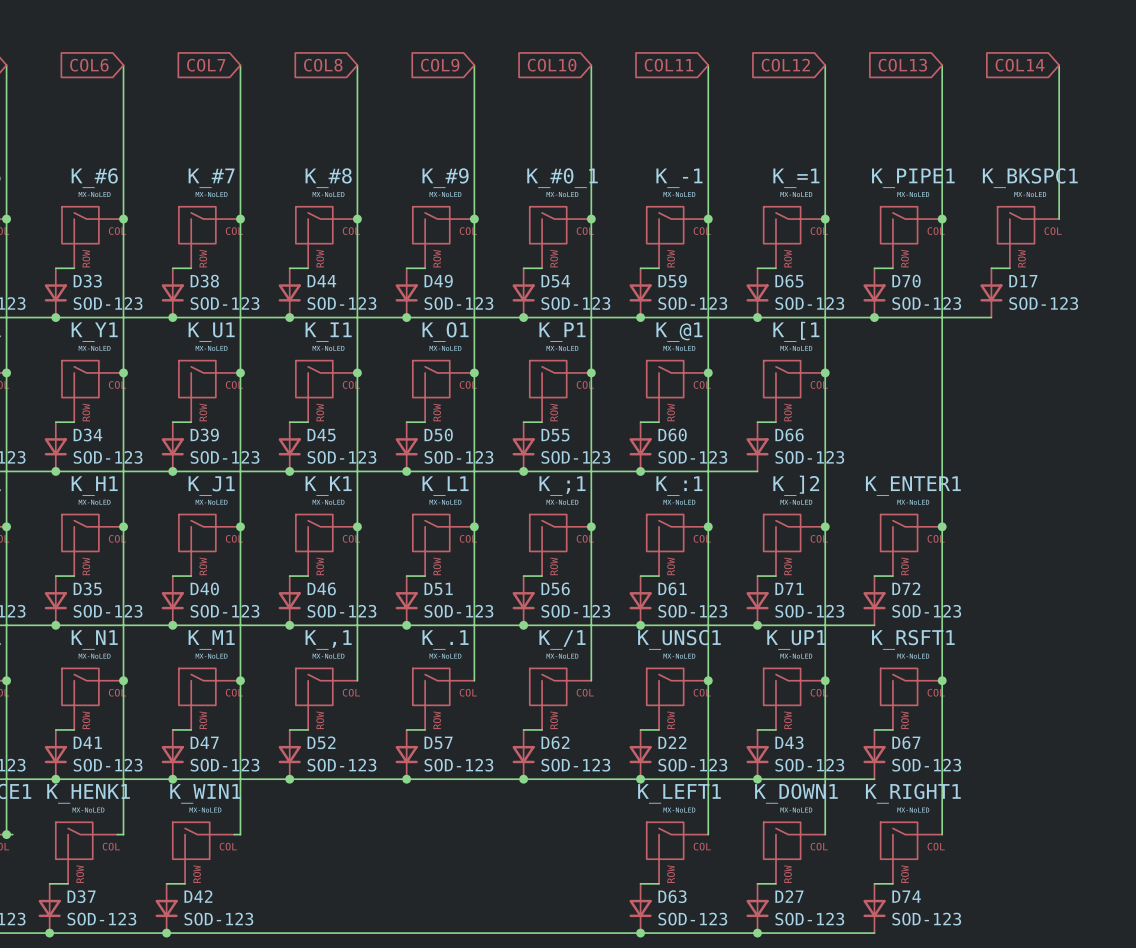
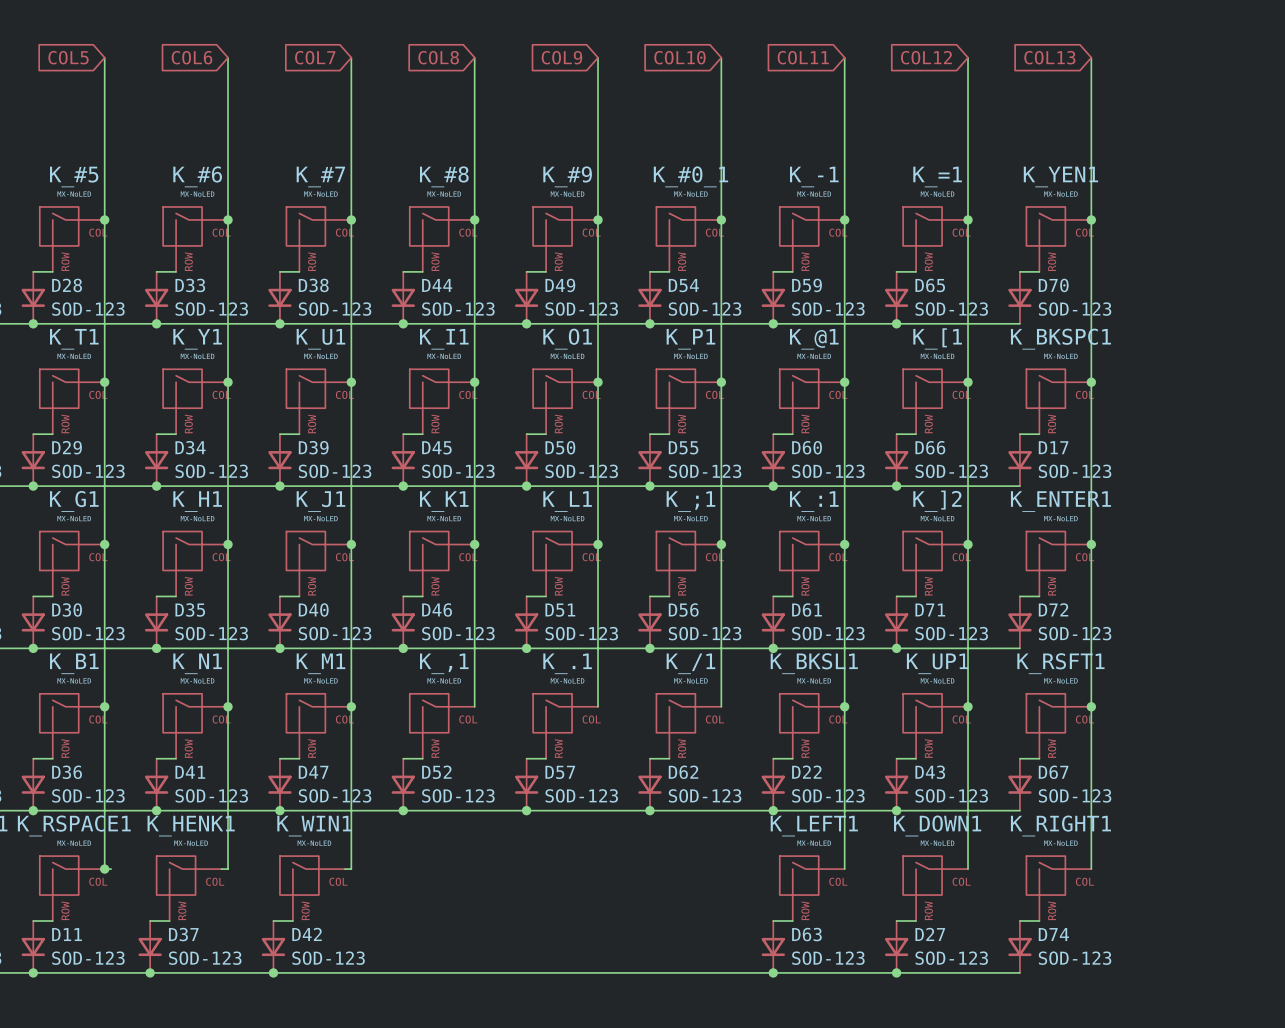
global label: COL14 (1020, 65) -> none
wire: (1059, 65) (1059, 219) -> none
K_PIPE1 name: K_PIPE1 (913, 178) -> K_YEN1 (1060, 176)
K_BKSPC1 position: (1028, 237) -> (1058, 401)
wire: (991, 268) (1009, 268) -> (1019, 434) (1039, 434)
D17 position: (991, 292) -> (1019, 460)
wire: (874, 317) (991, 317) -> (896, 486) (1019, 486)
junction: (874, 317) -> none
junction: none -> (1091, 382)
junction: none -> (896, 486)
K_UNSC1 name: K_UNSC1 (679, 639) -> K_BKSL1 (814, 663)

